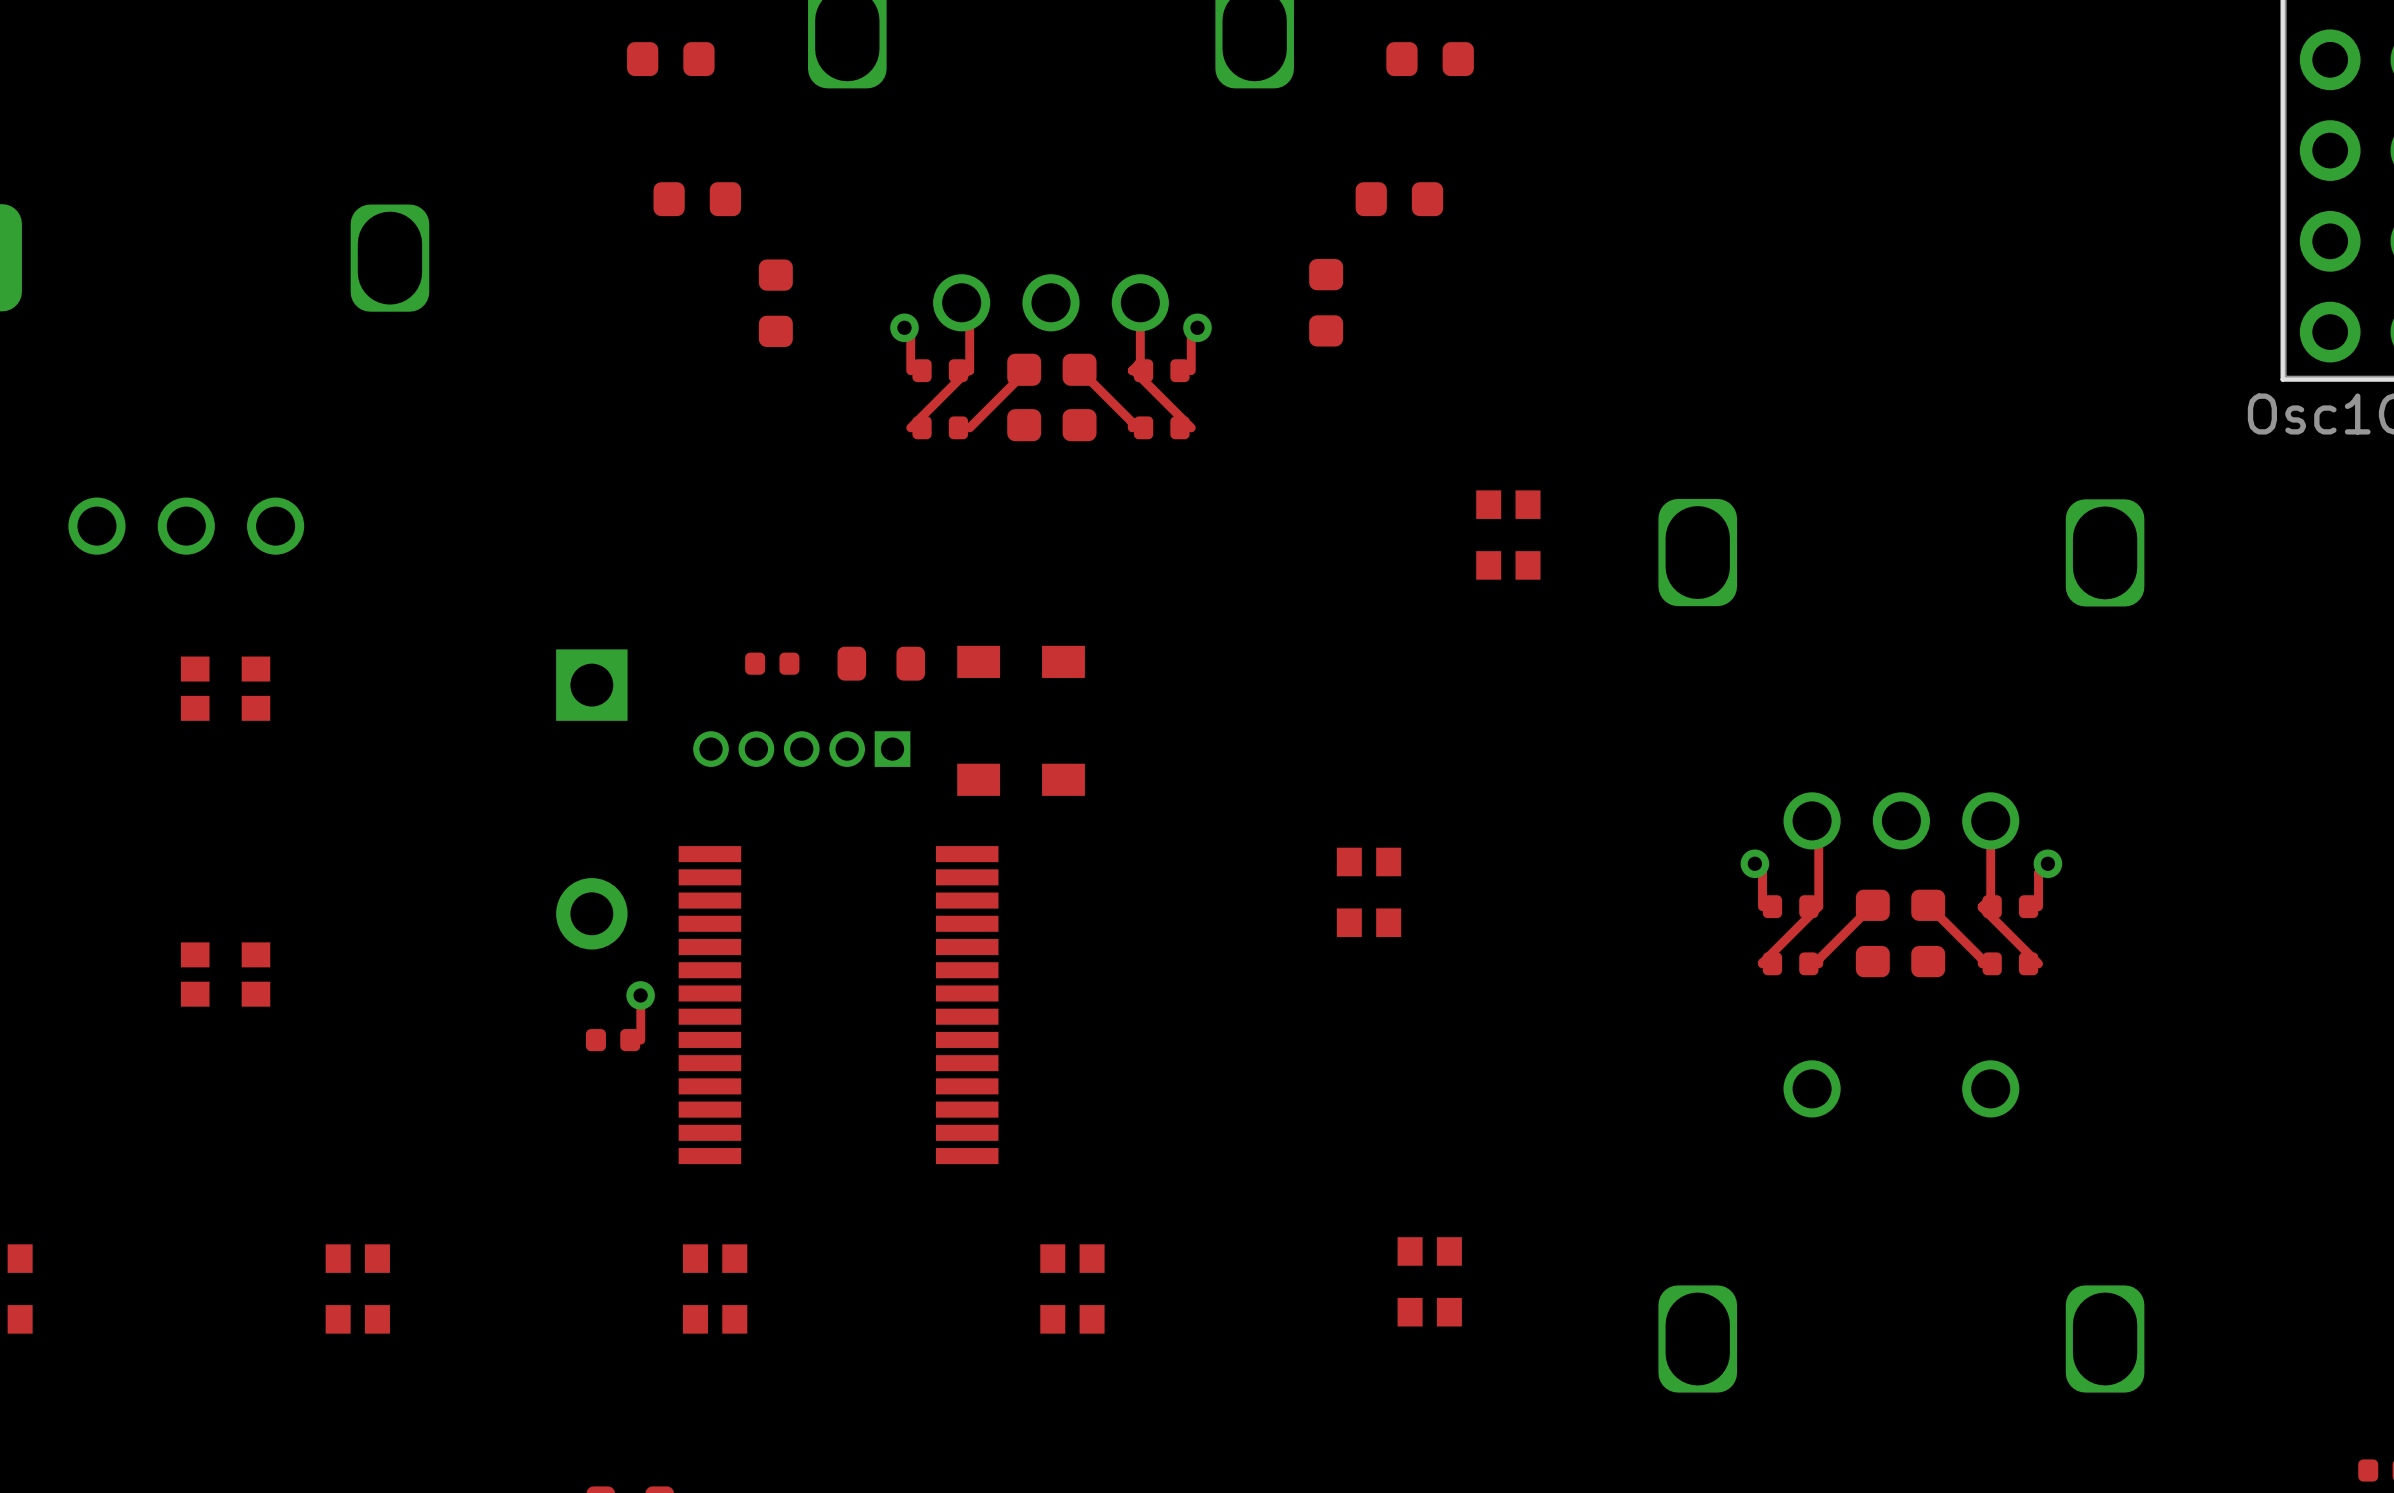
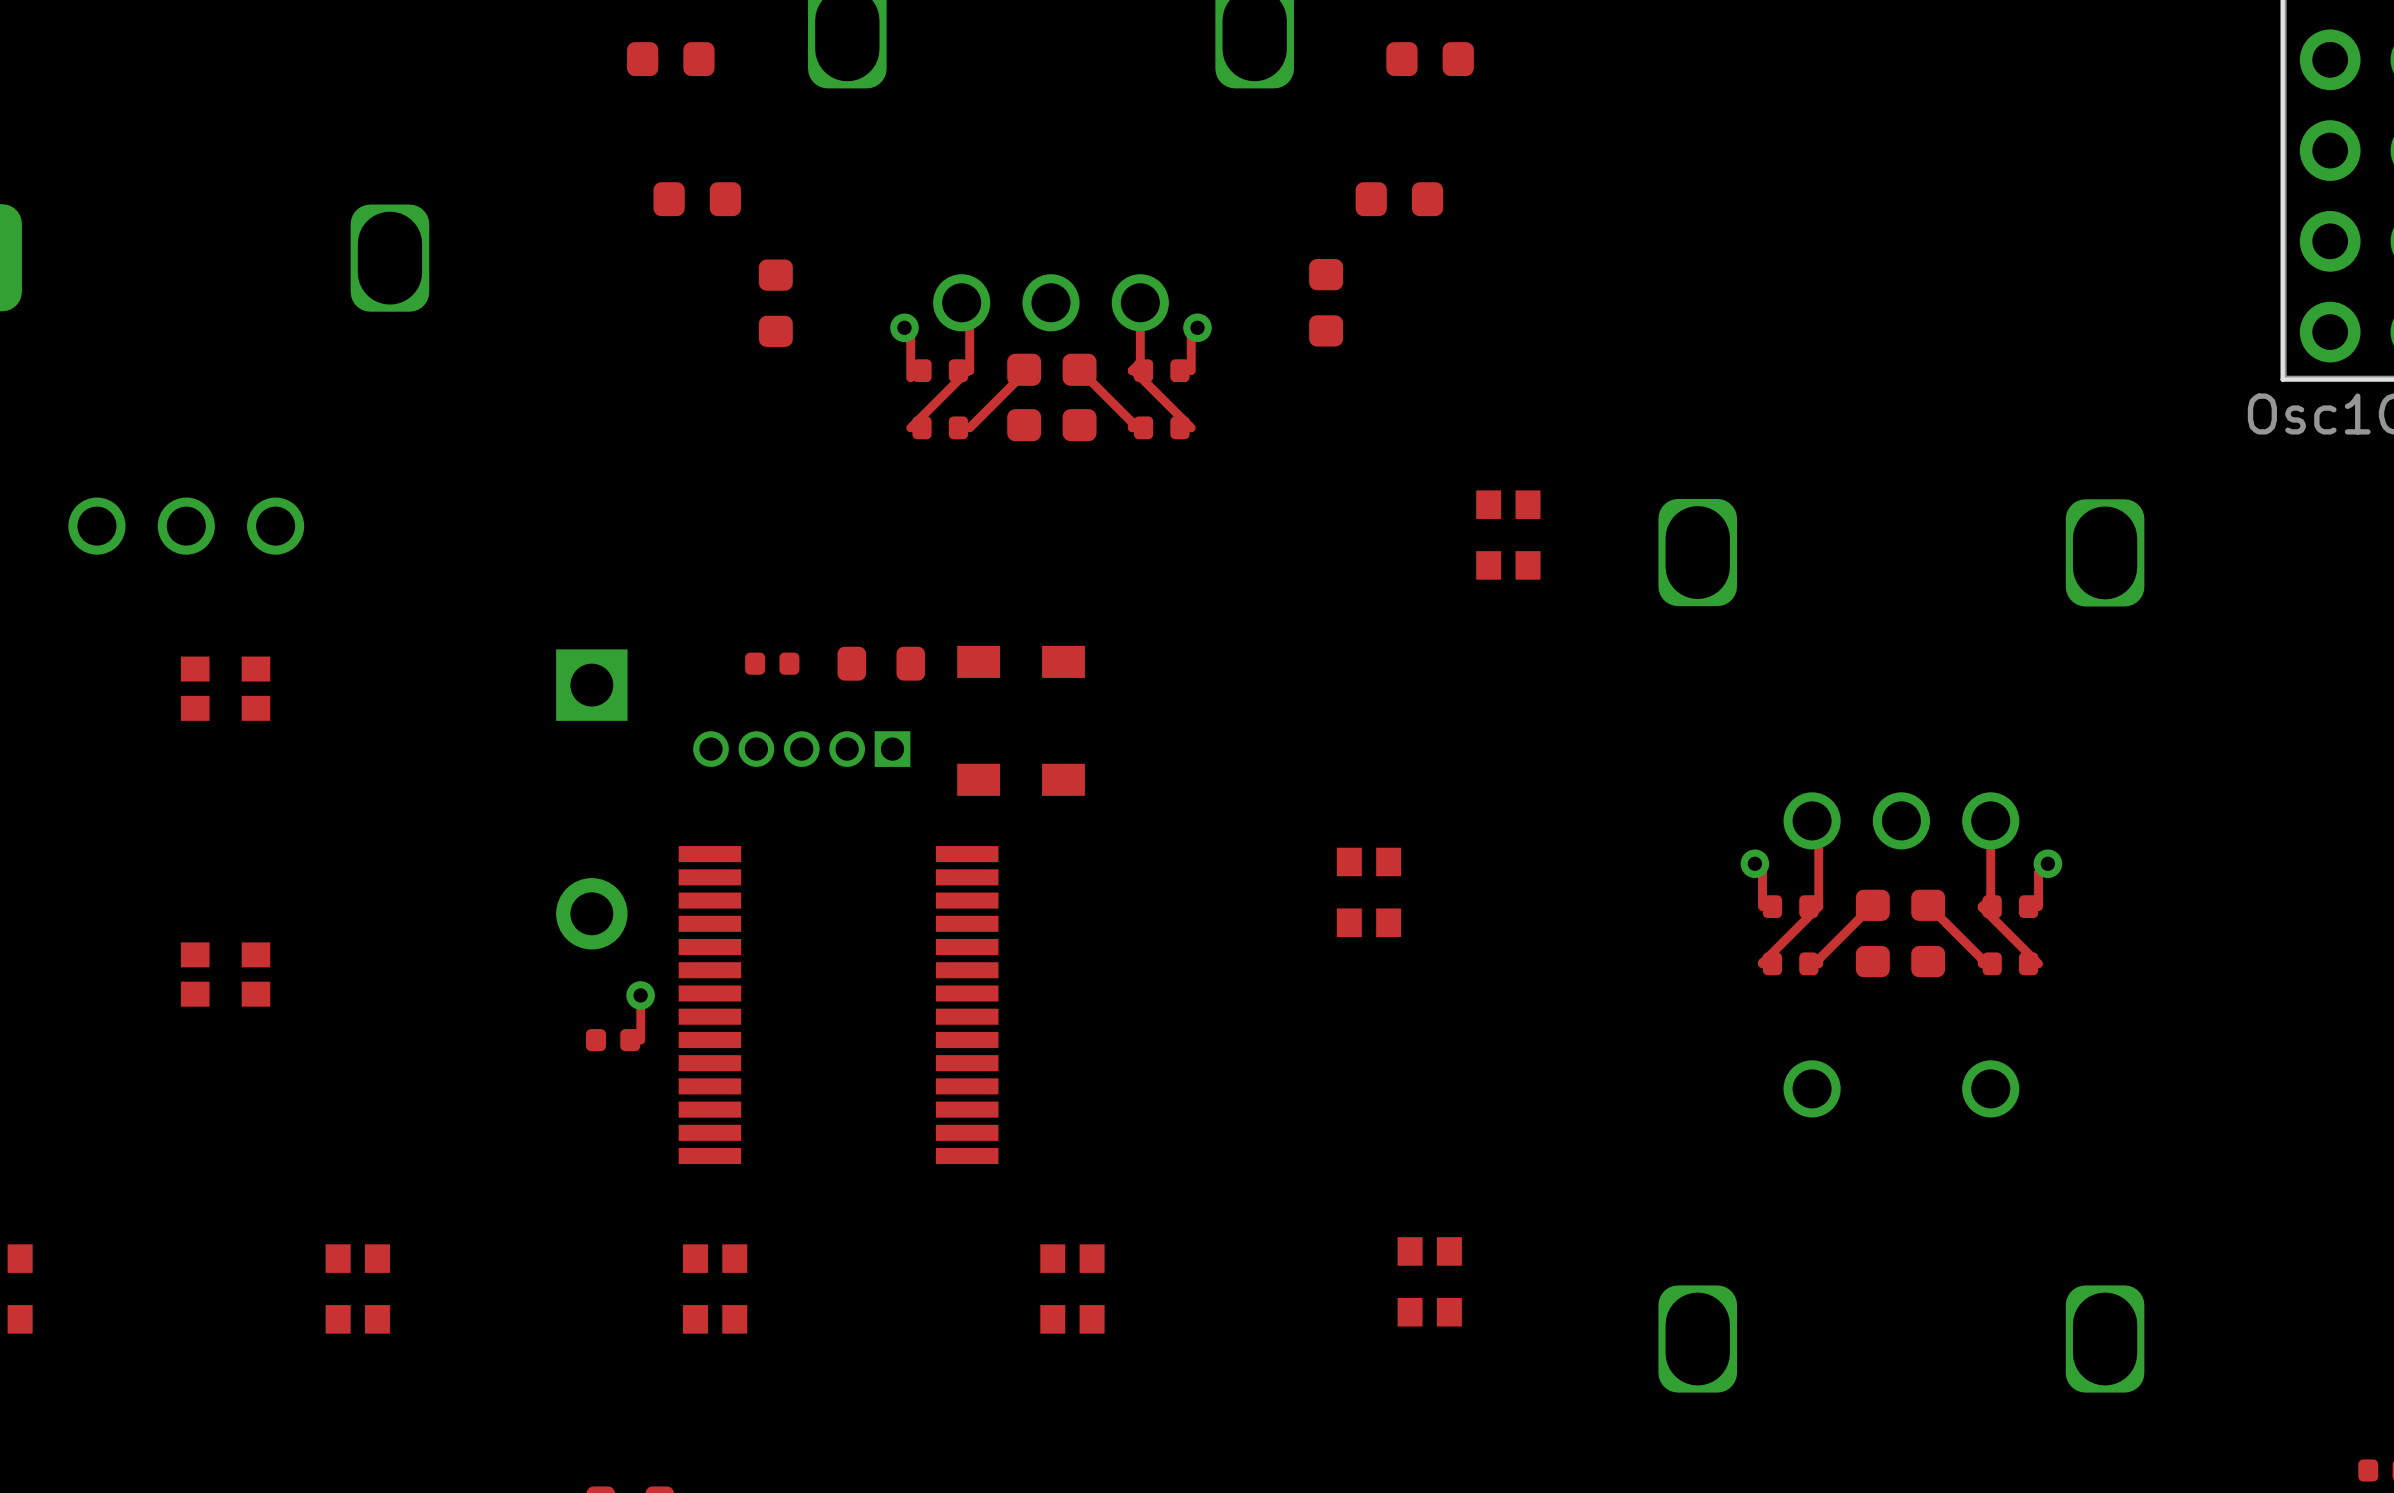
top track: none -> (910, 370) (910, 377)

